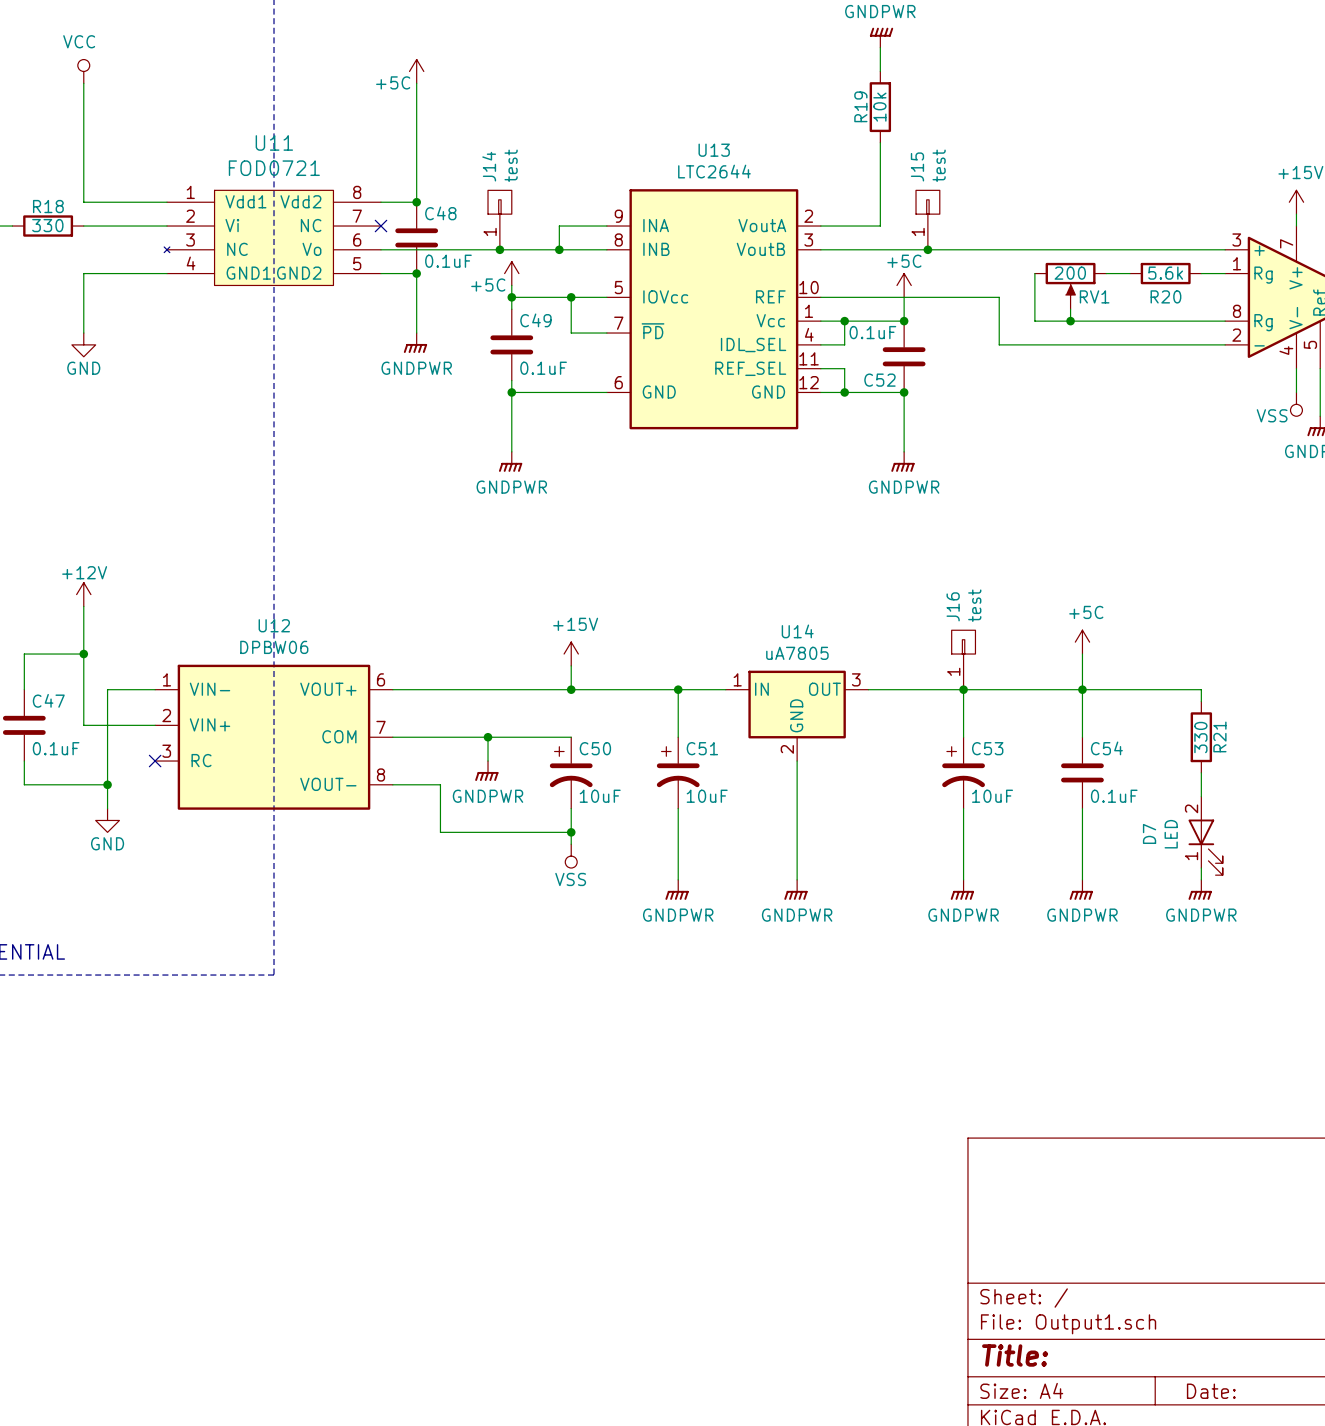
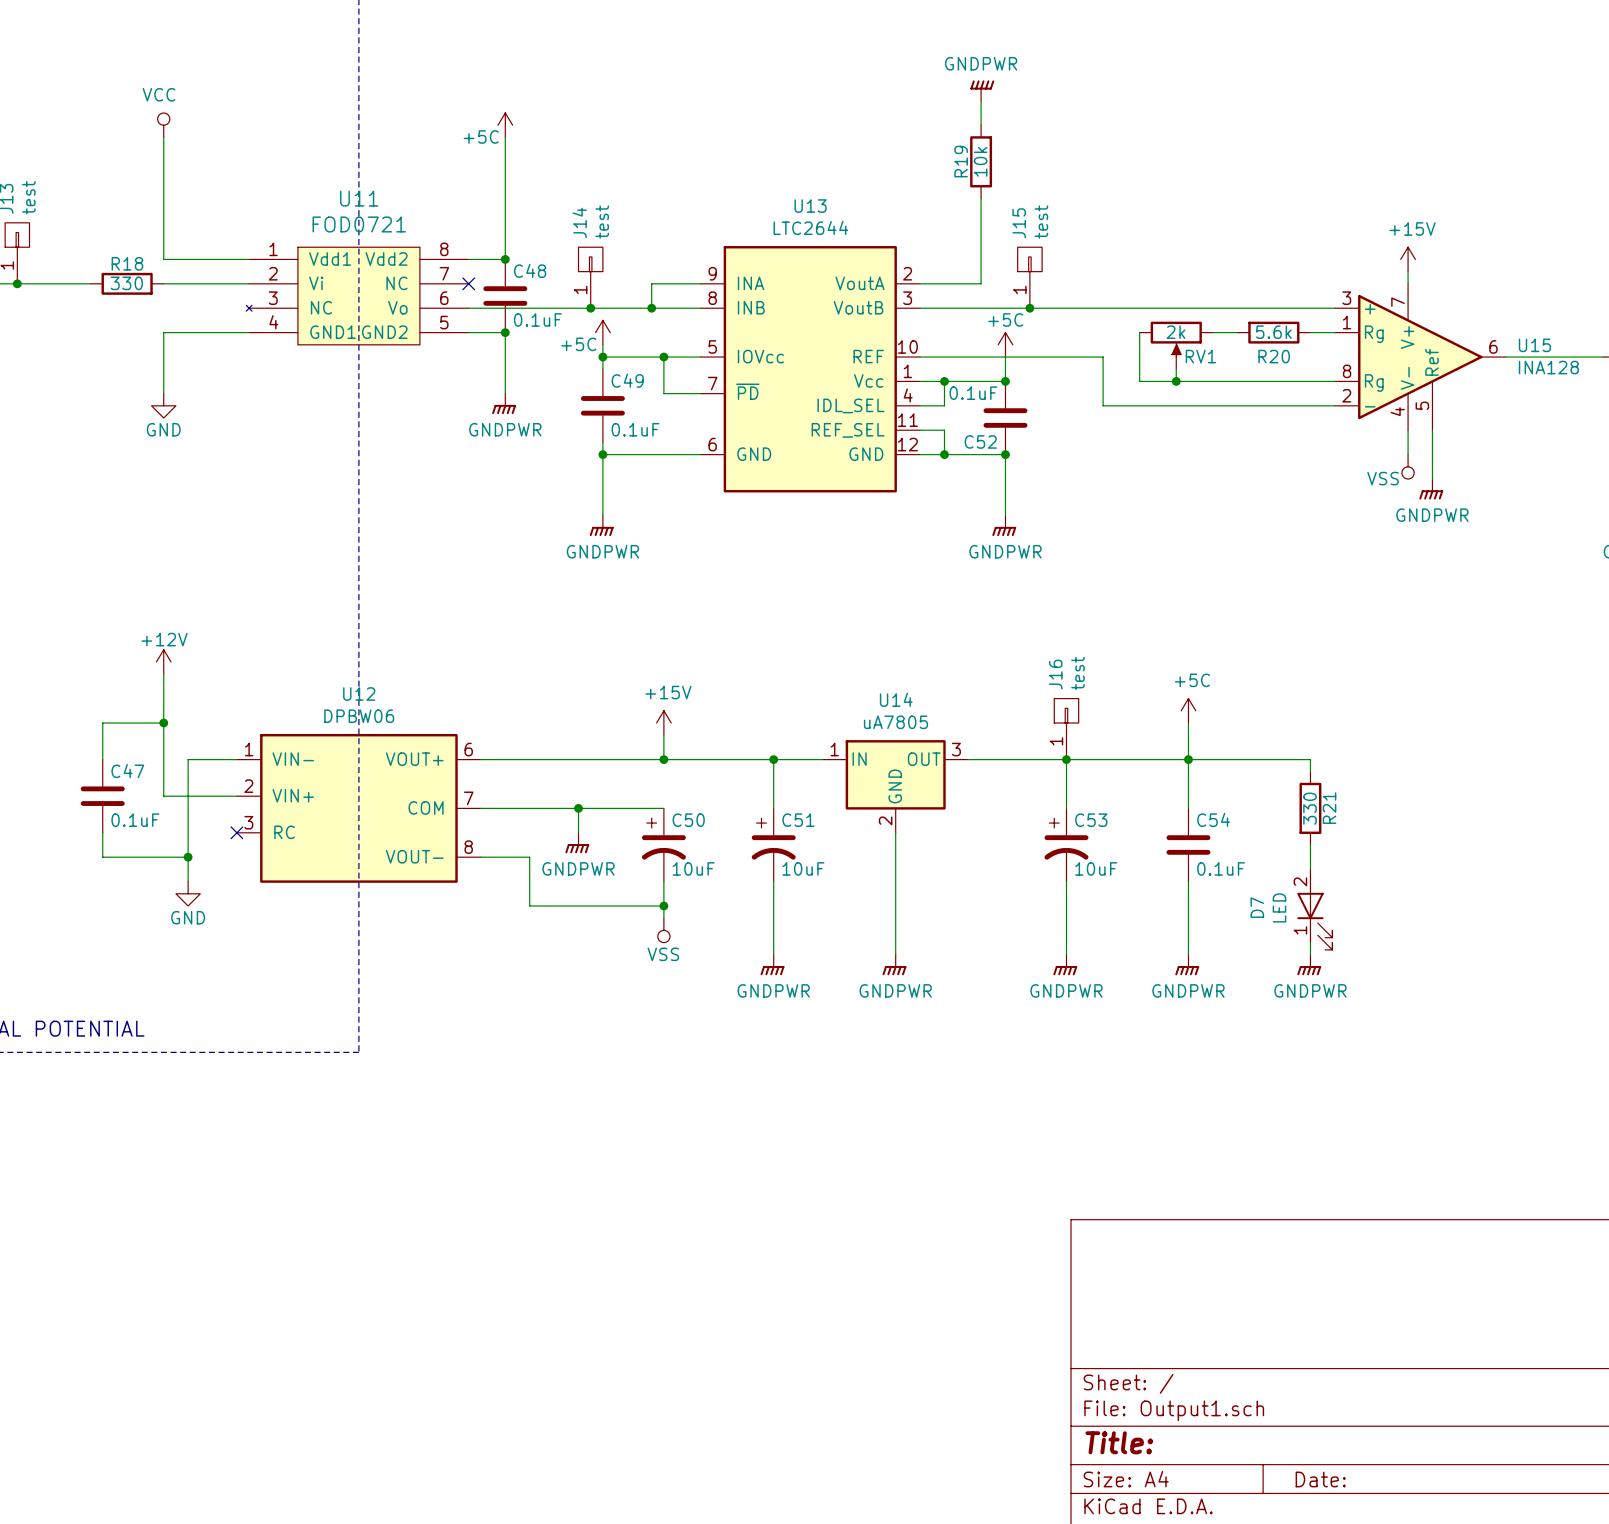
RV1 value: 200 (1070, 273) -> 2k (1175, 332)

